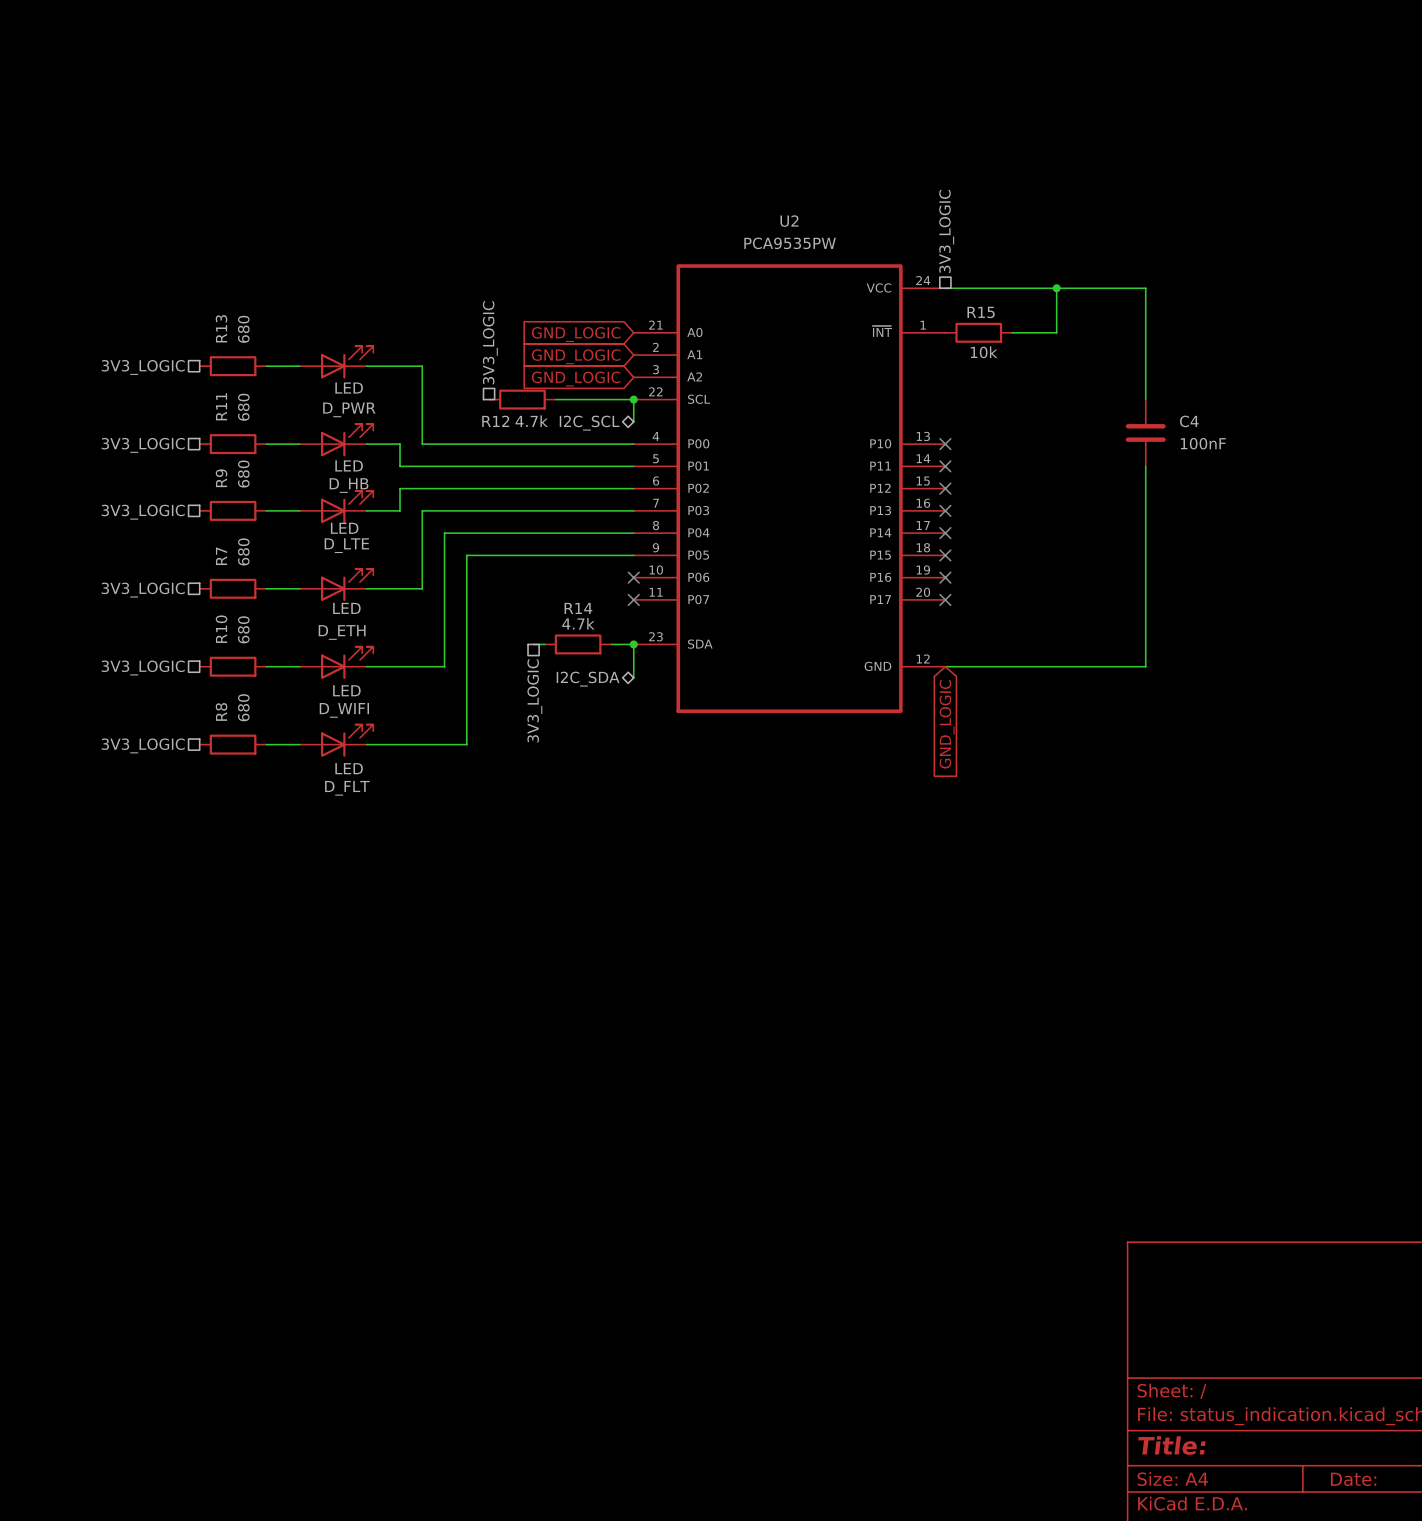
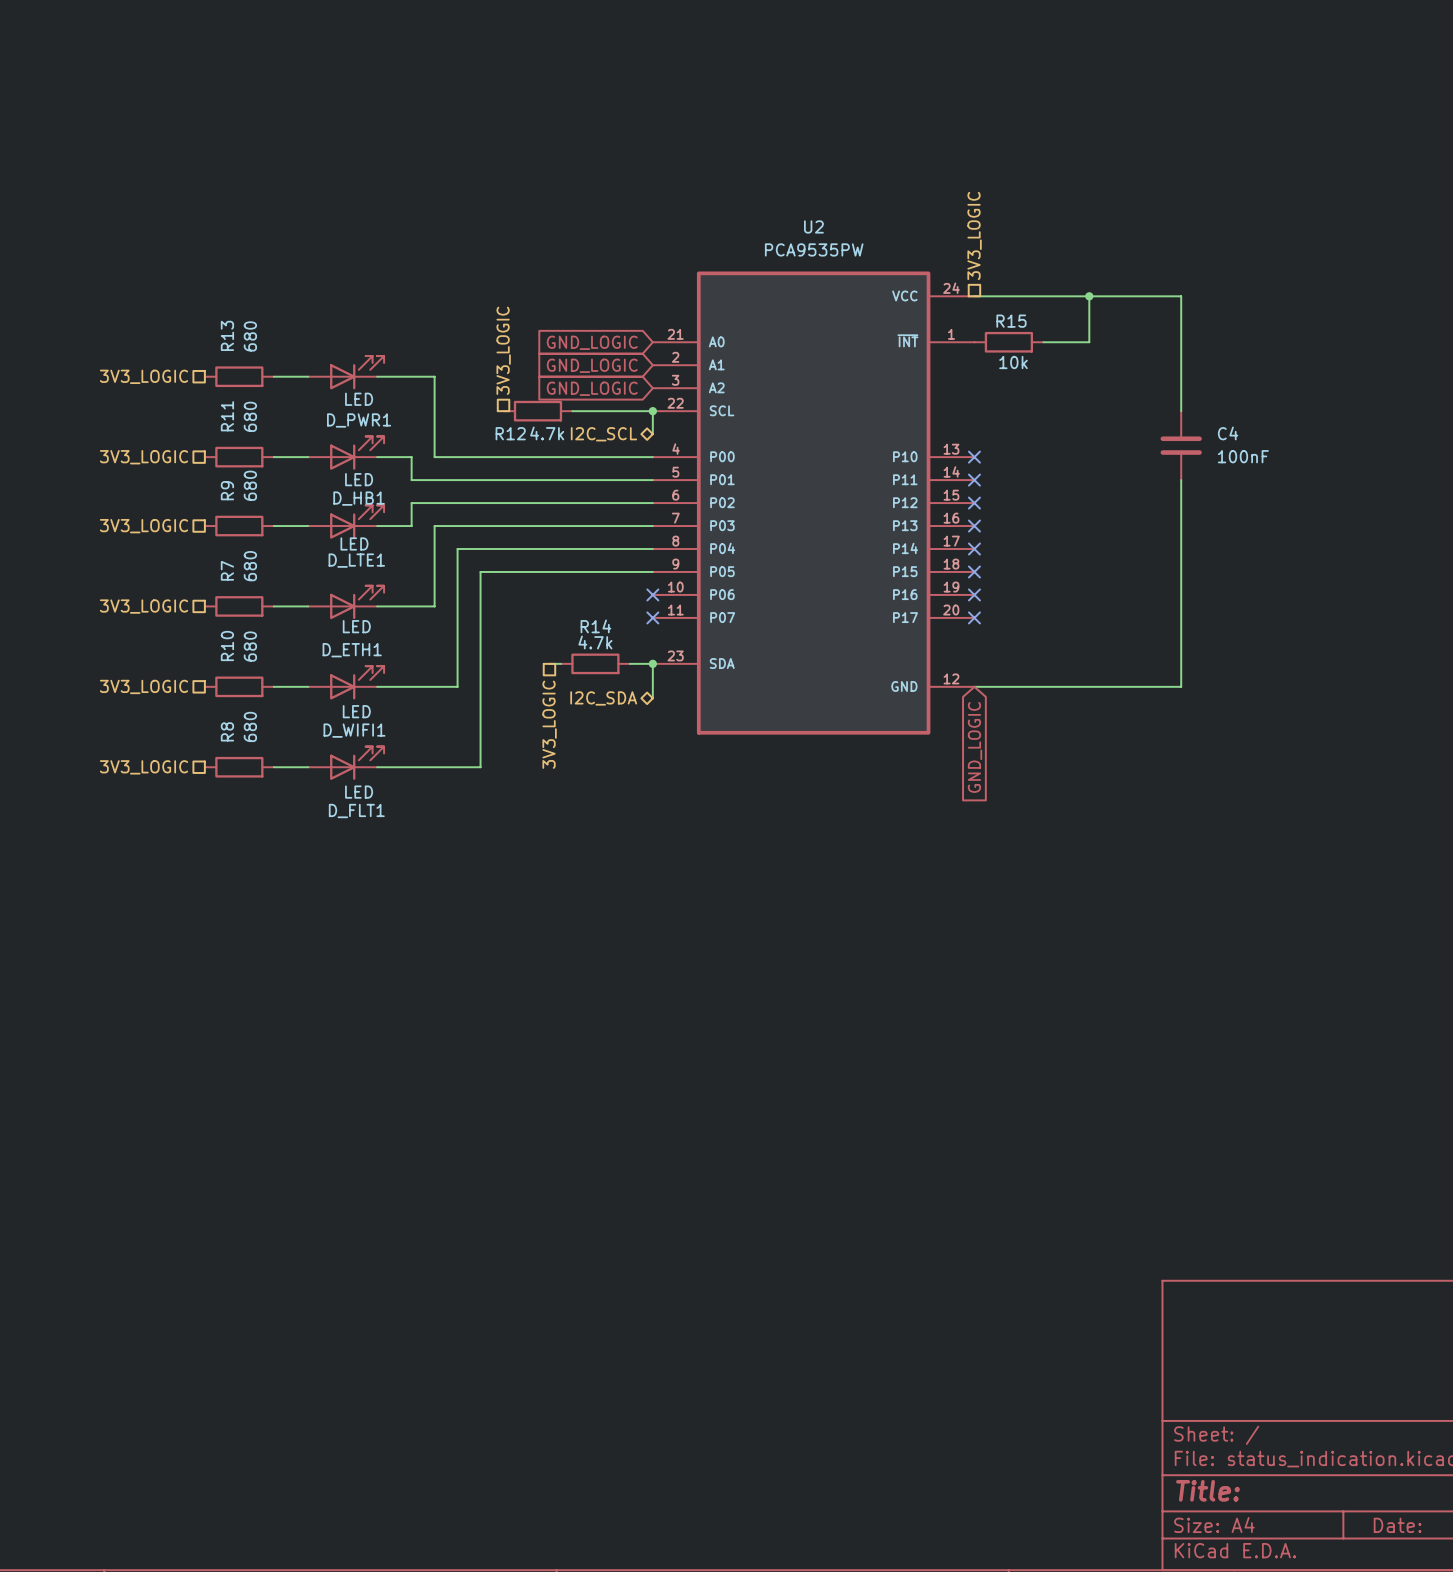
D_PWR name: D_PWR (349, 409) -> D_PWR1 (359, 420)
D_HB name: D_HB (349, 485) -> D_HB1 (359, 498)
D_LTE name: D_LTE (346, 545) -> D_LTE1 (356, 560)
D_ETH name: D_ETH (342, 632) -> D_ETH1 (352, 650)
D_WIFI name: D_WIFI (344, 710) -> D_WIFI1 (354, 730)
D_FLT name: D_FLT (347, 788) -> D_FLT1 (356, 811)

